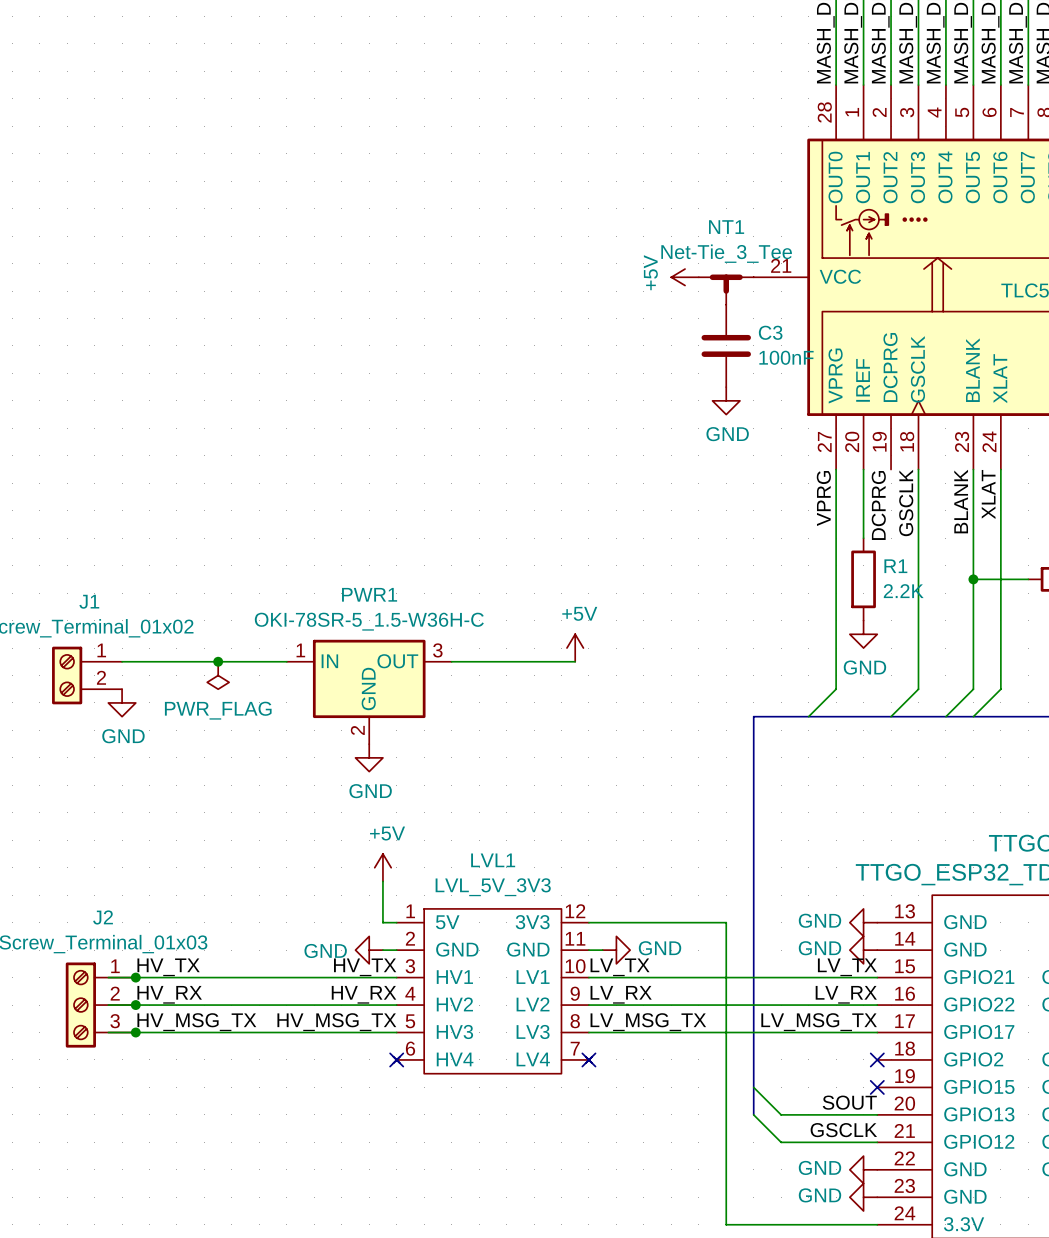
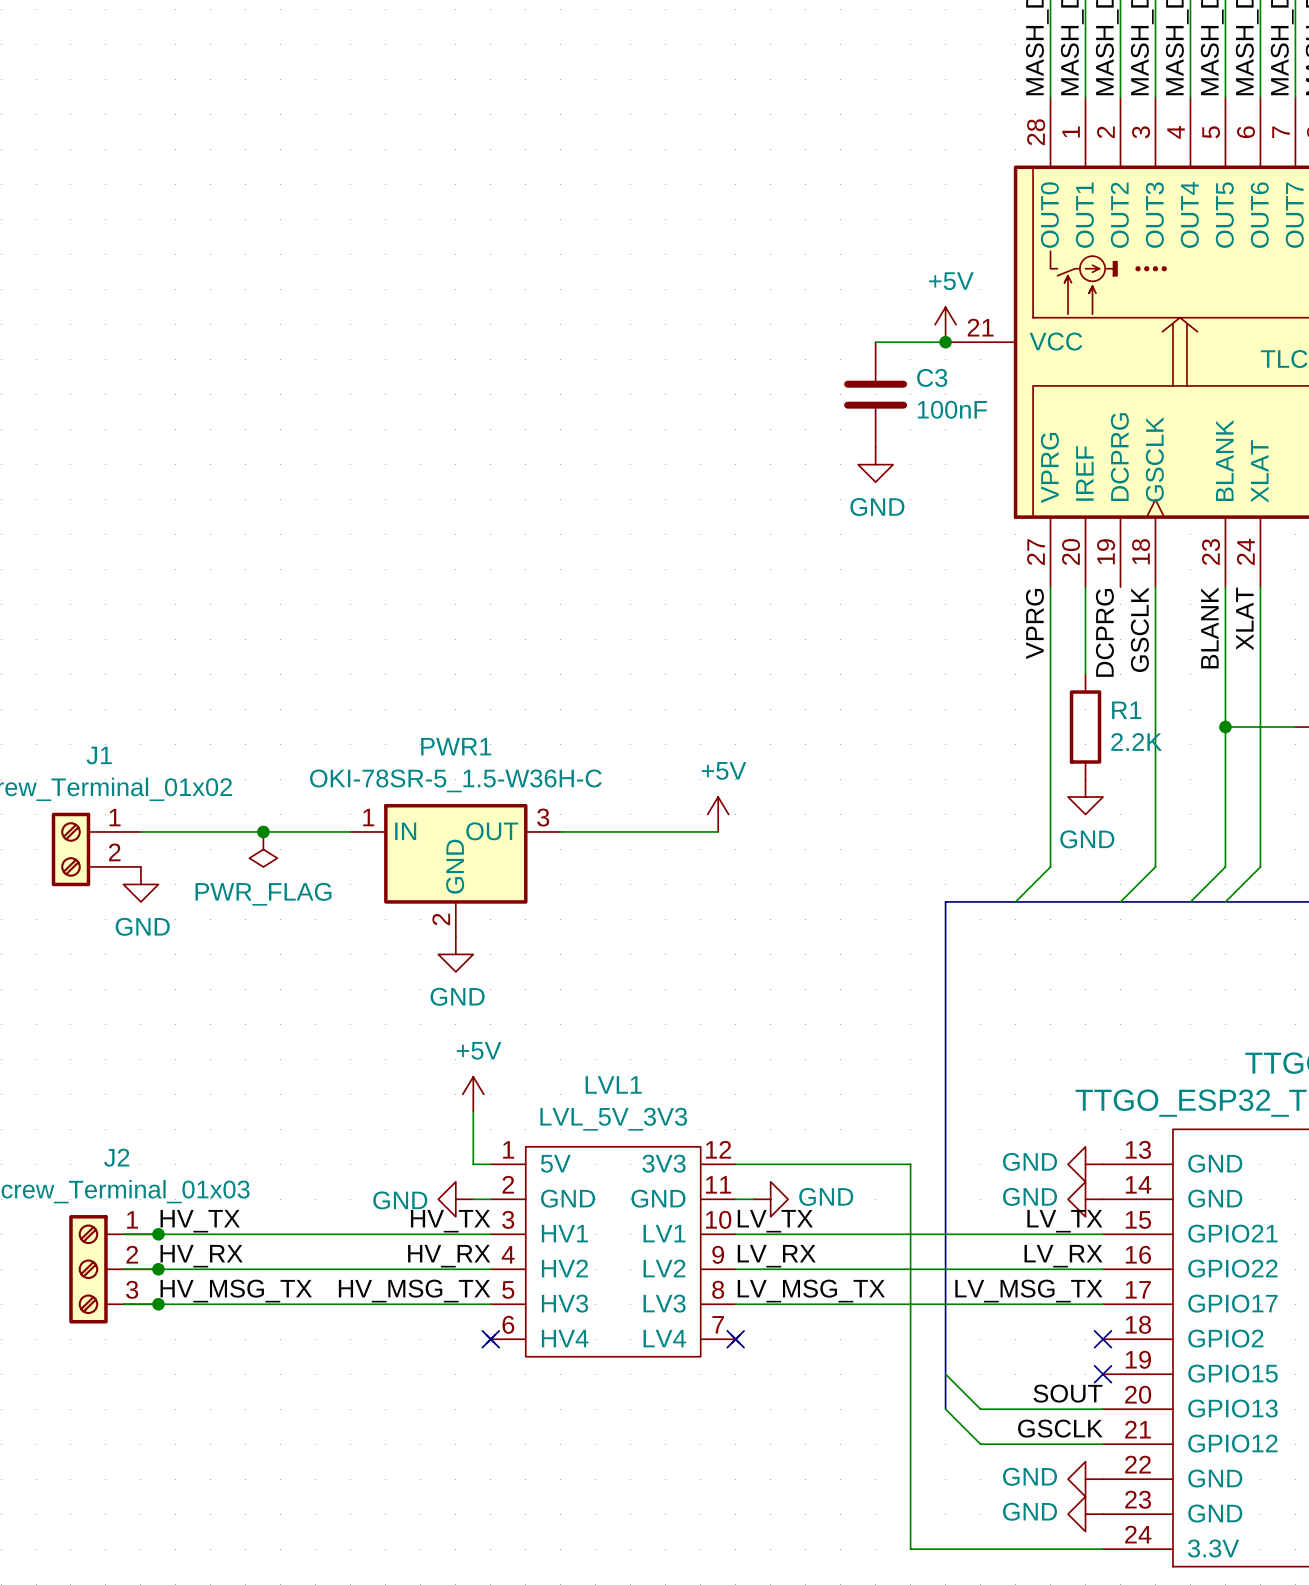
power symbol rotation: 0° (685, 277) -> 90° clockwise (945, 324)
power symbol position: +5V (685, 277) -> +5V (945, 324)
junction: none -> (945, 342)
NT1: Net-Tie_3_Tee (726, 290) -> none
C3 position: (726, 345) -> (875, 394)
power symbol position: GND (726, 400) -> GND (875, 464)

